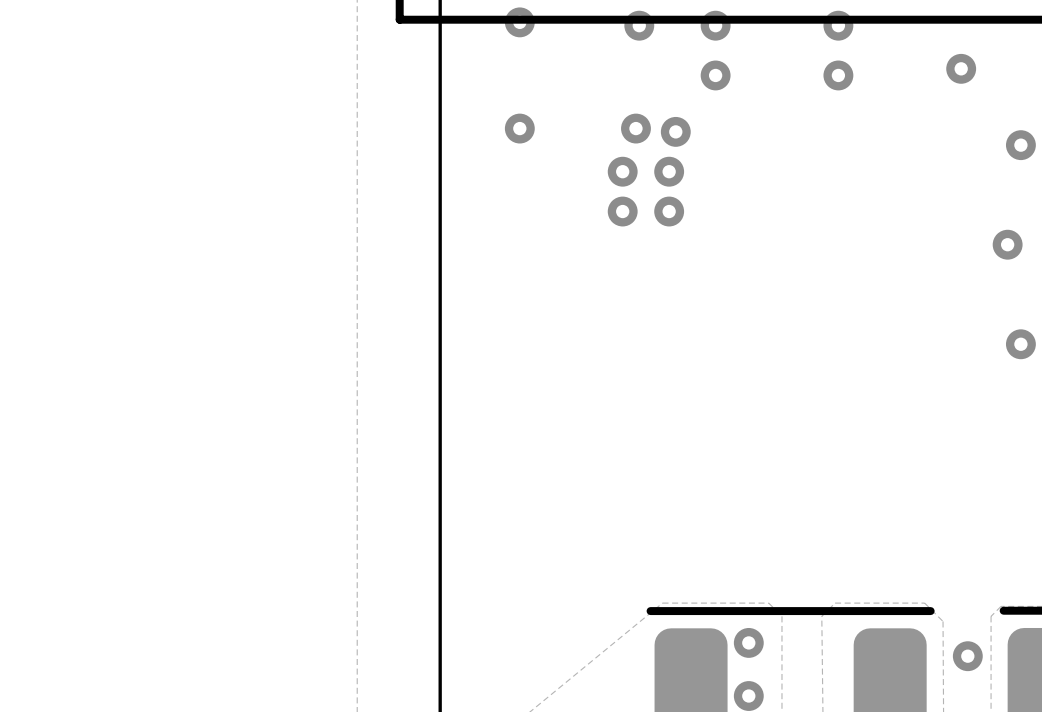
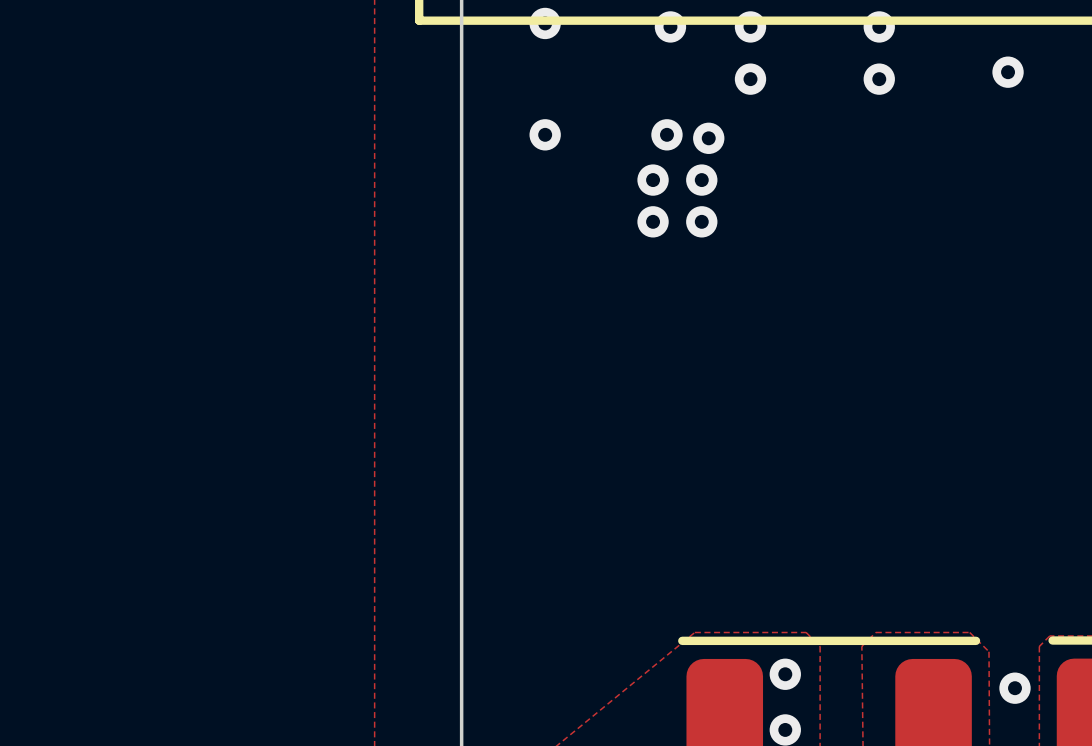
via: (1020, 145) -> none
via: (1007, 244) -> none
via: (1020, 344) -> none

